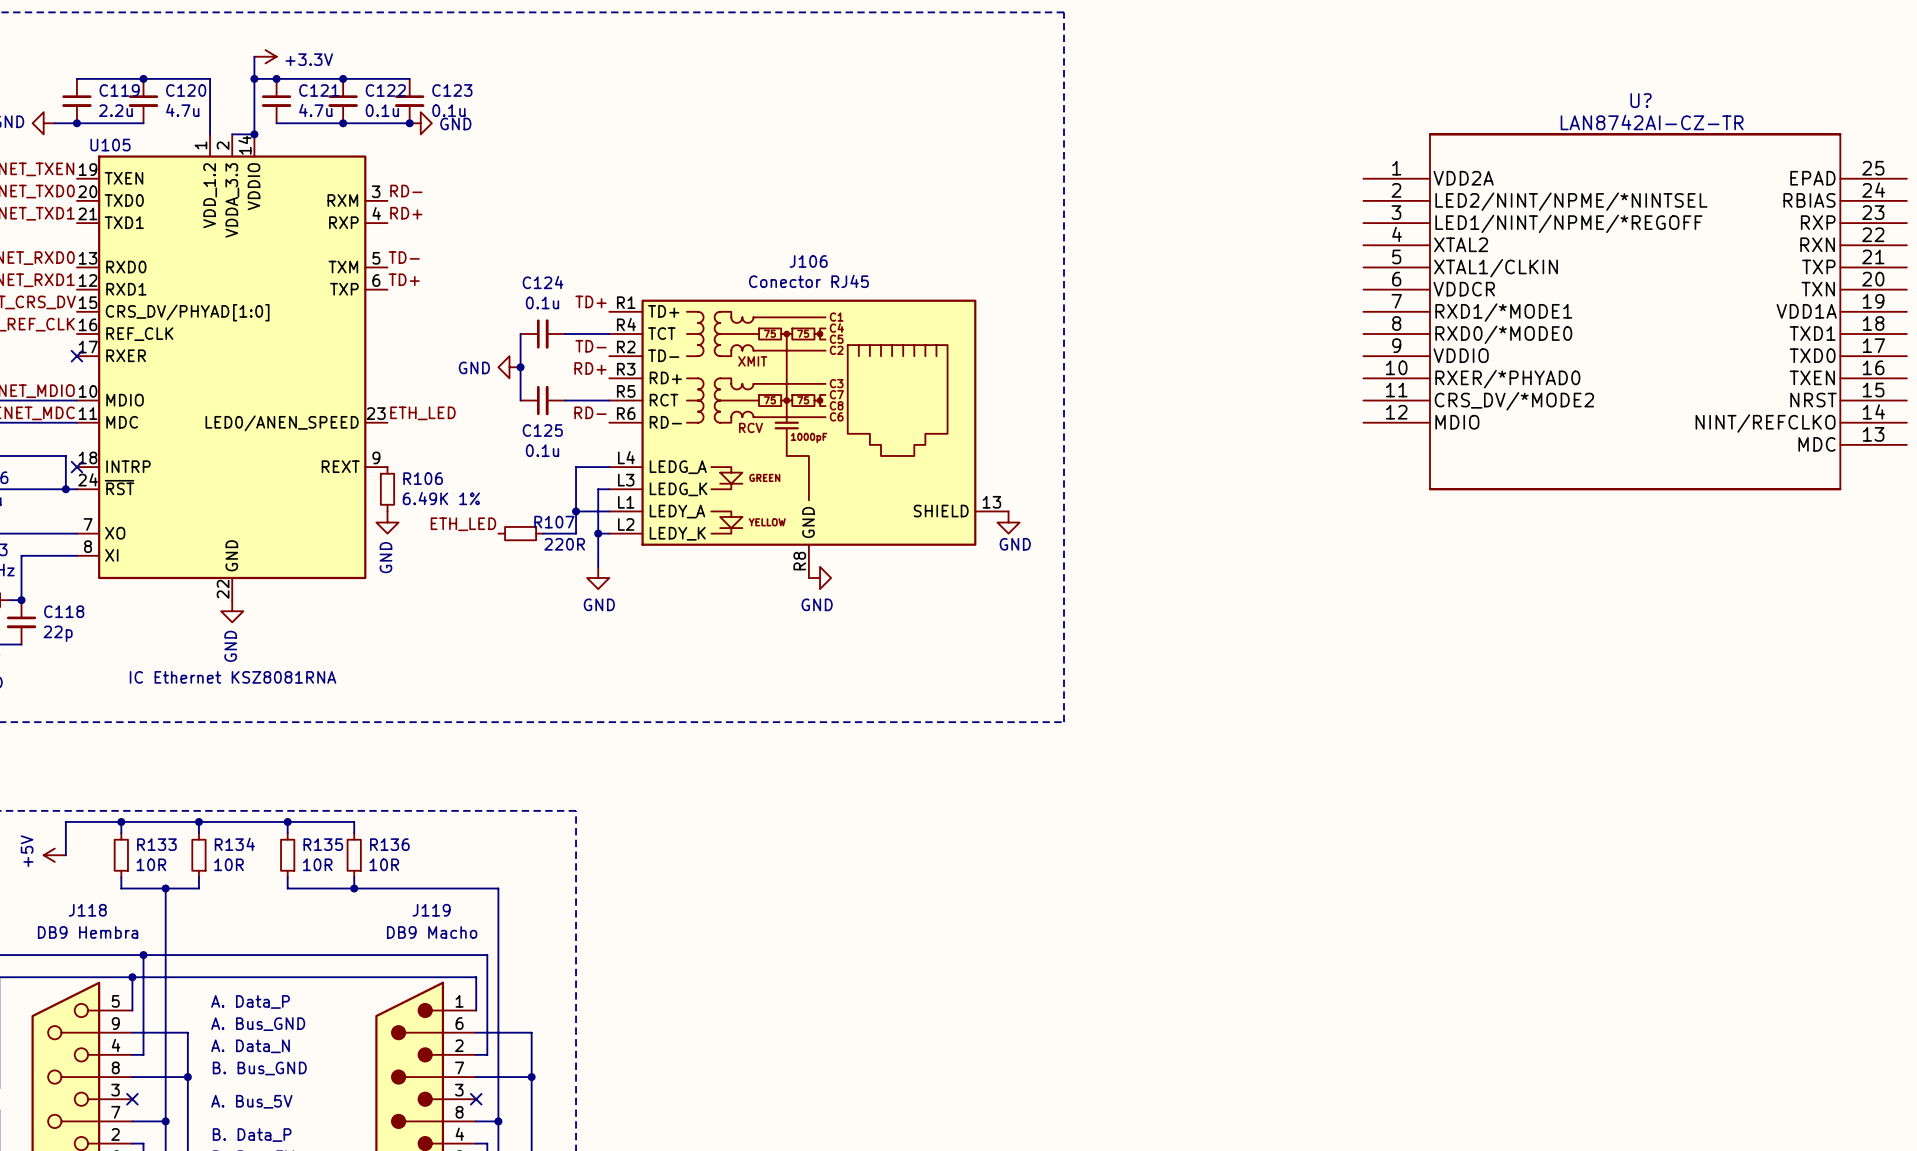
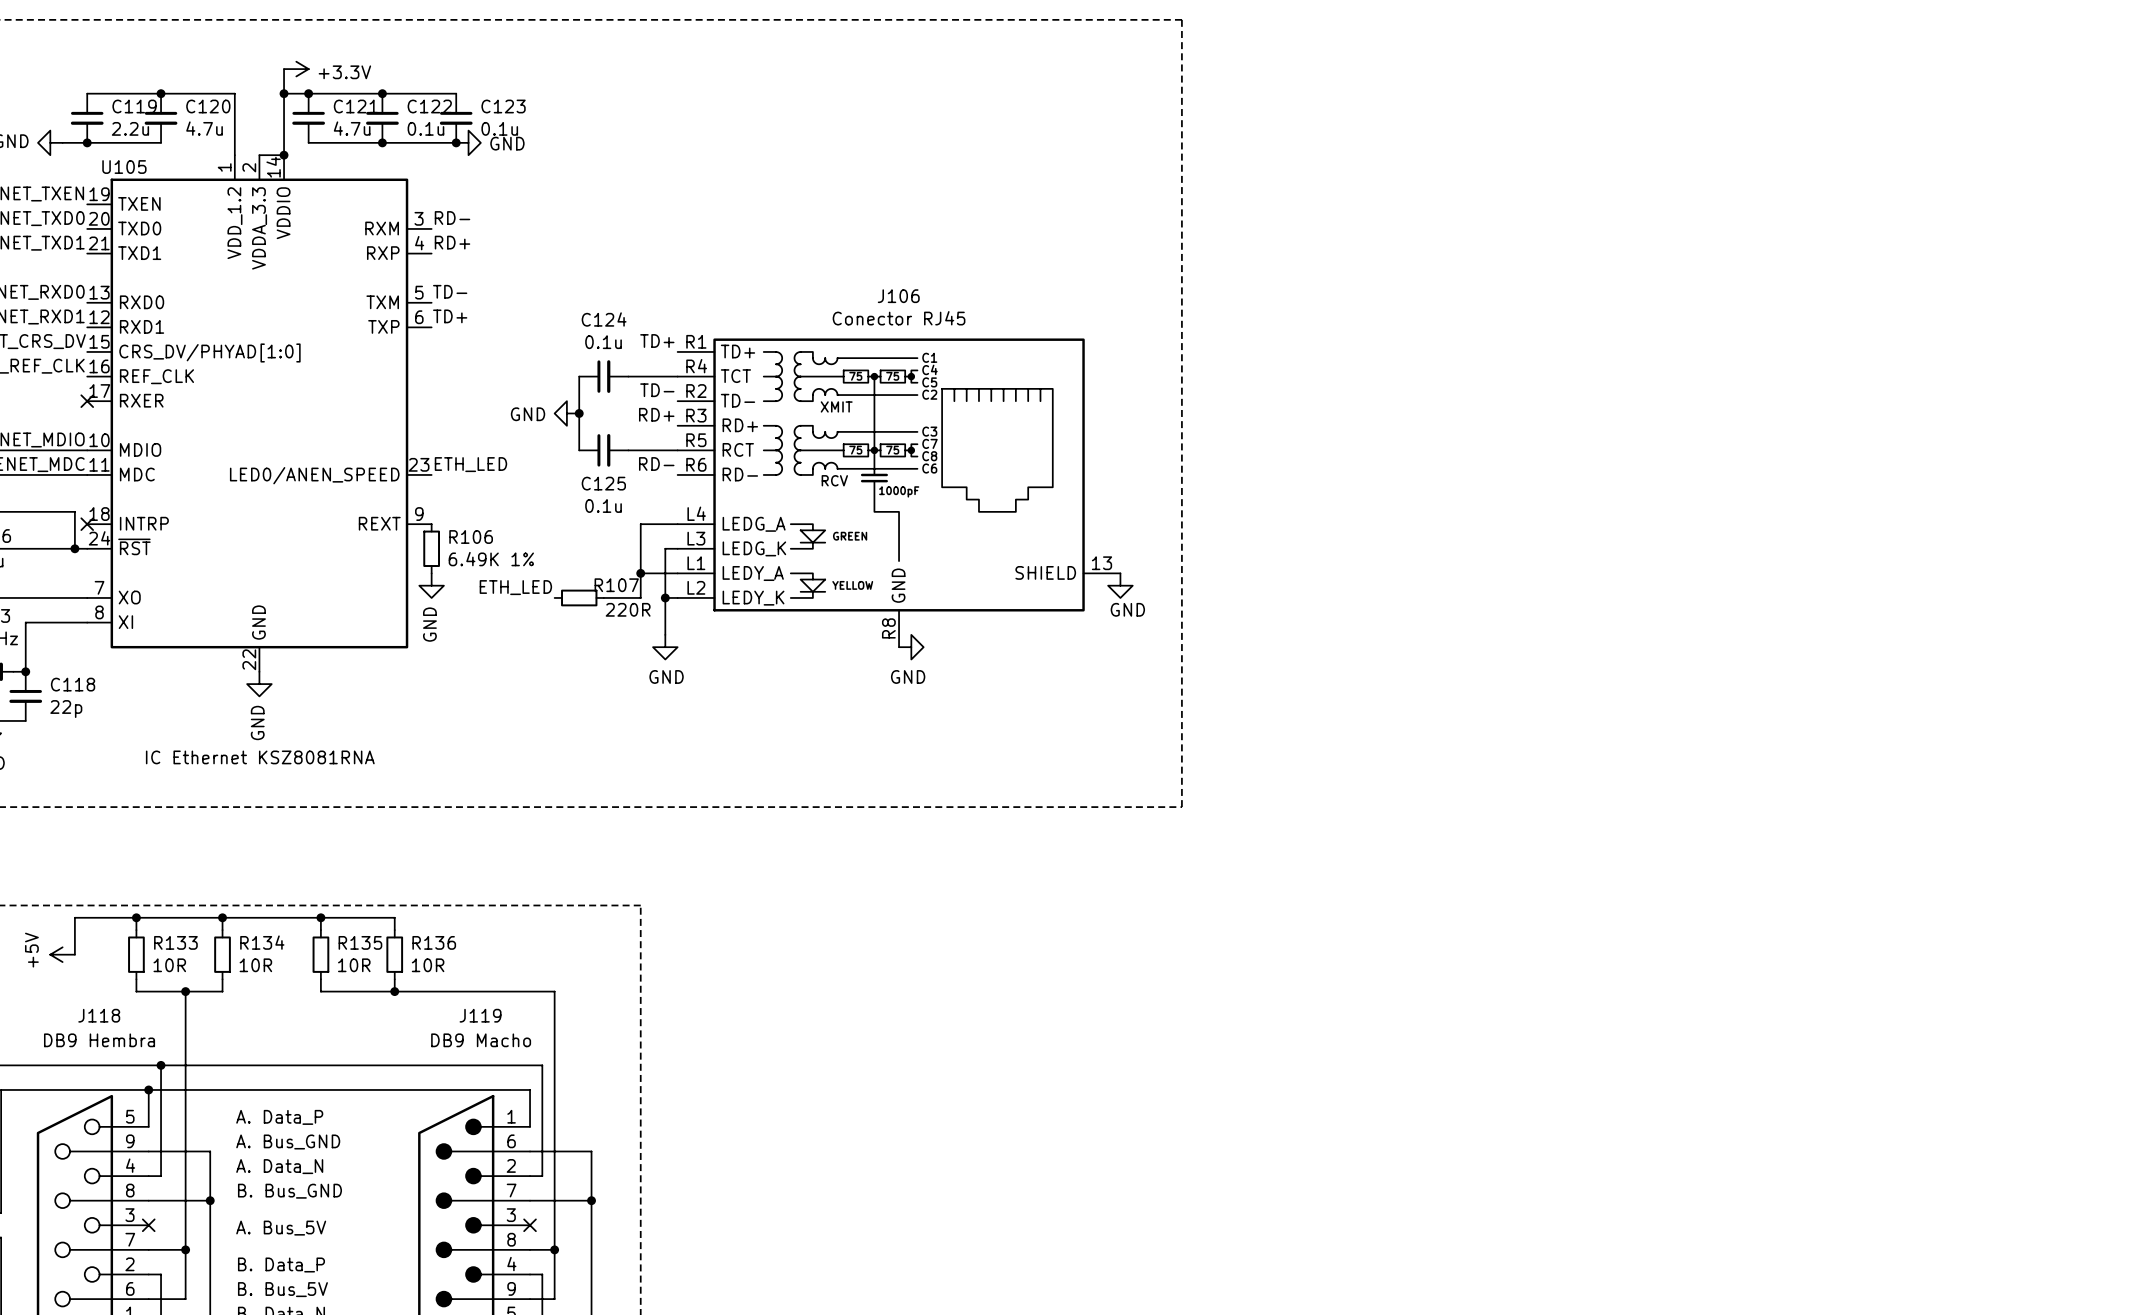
U?: LAN8742AI-CZ-TR (1635, 311) -> none

